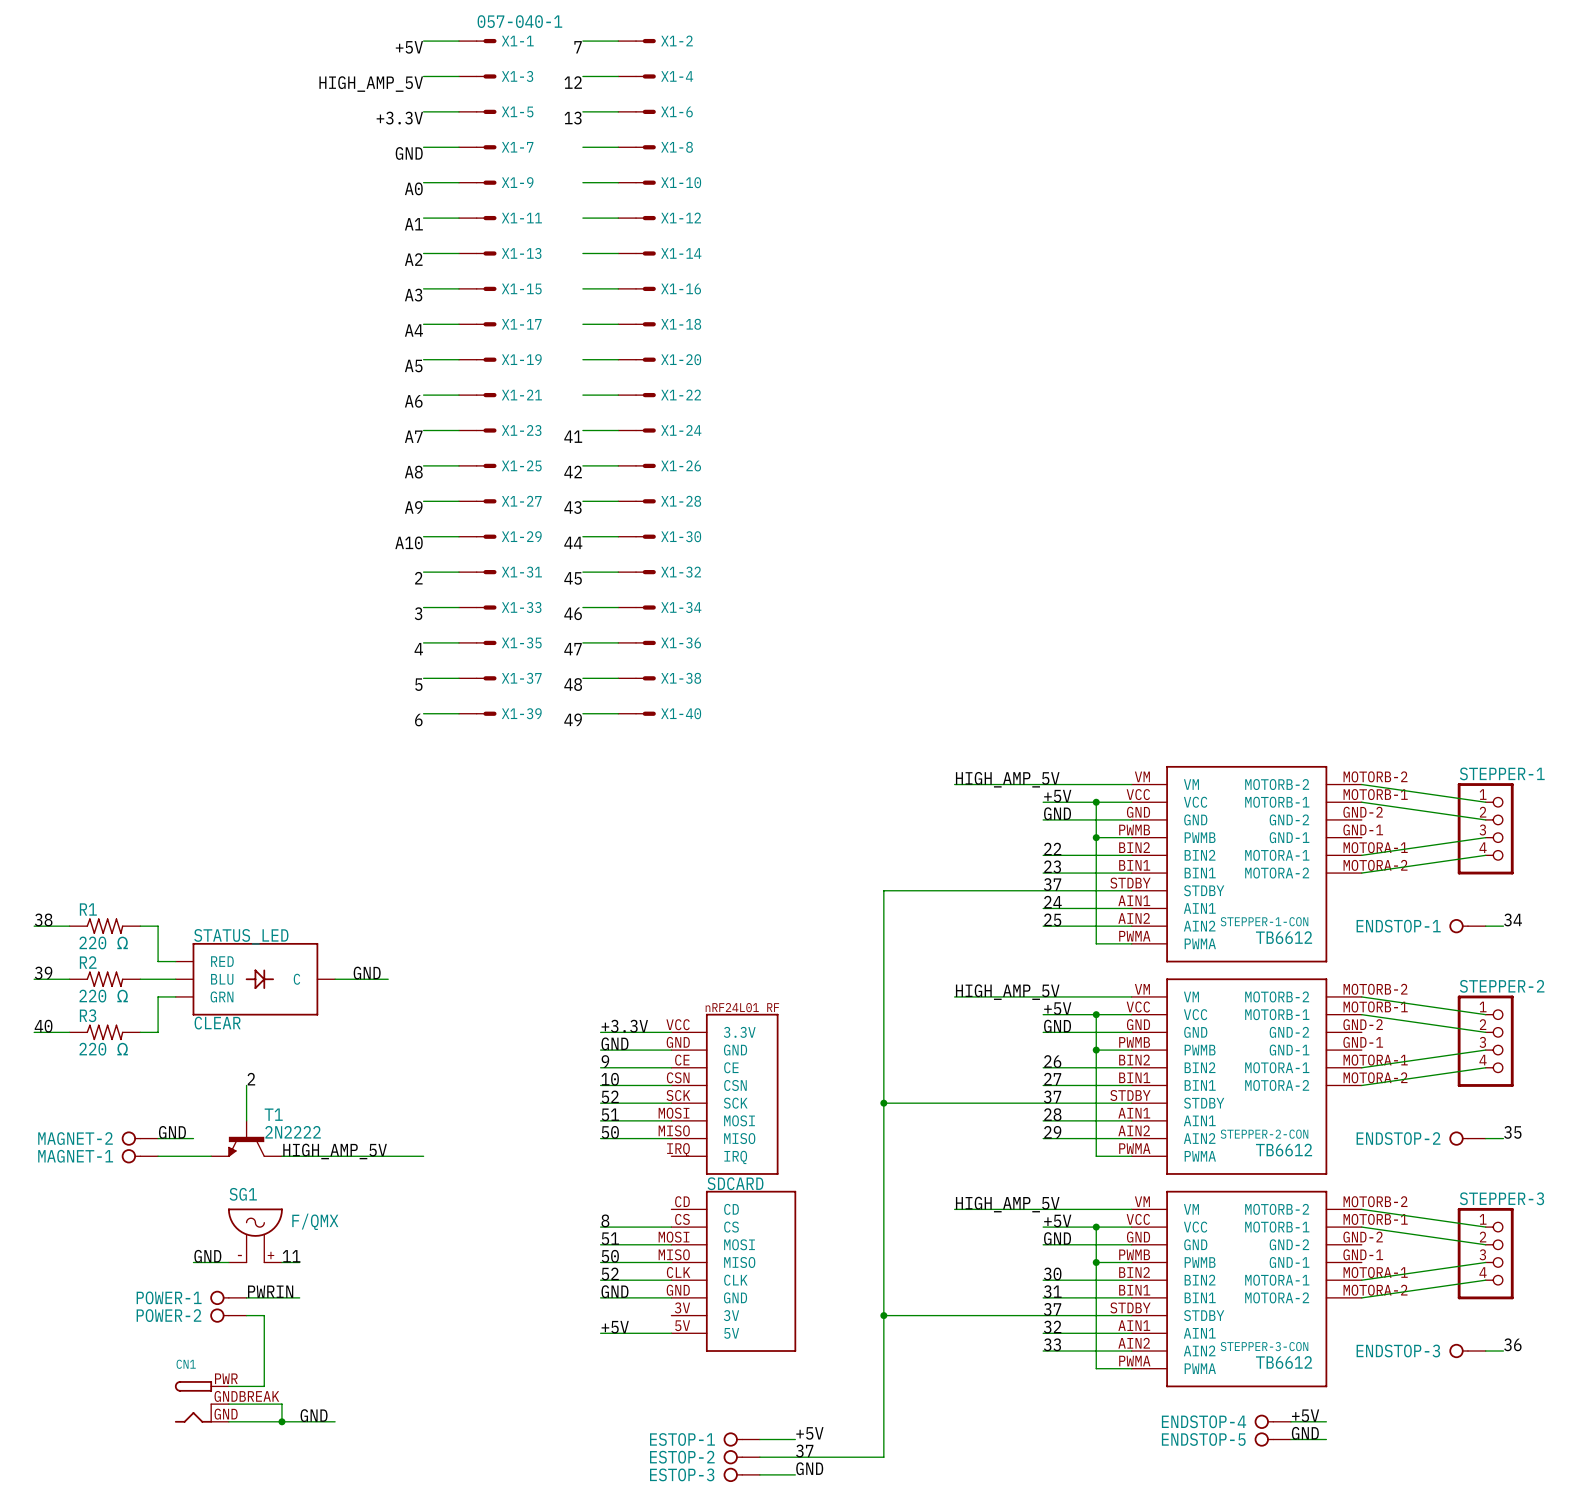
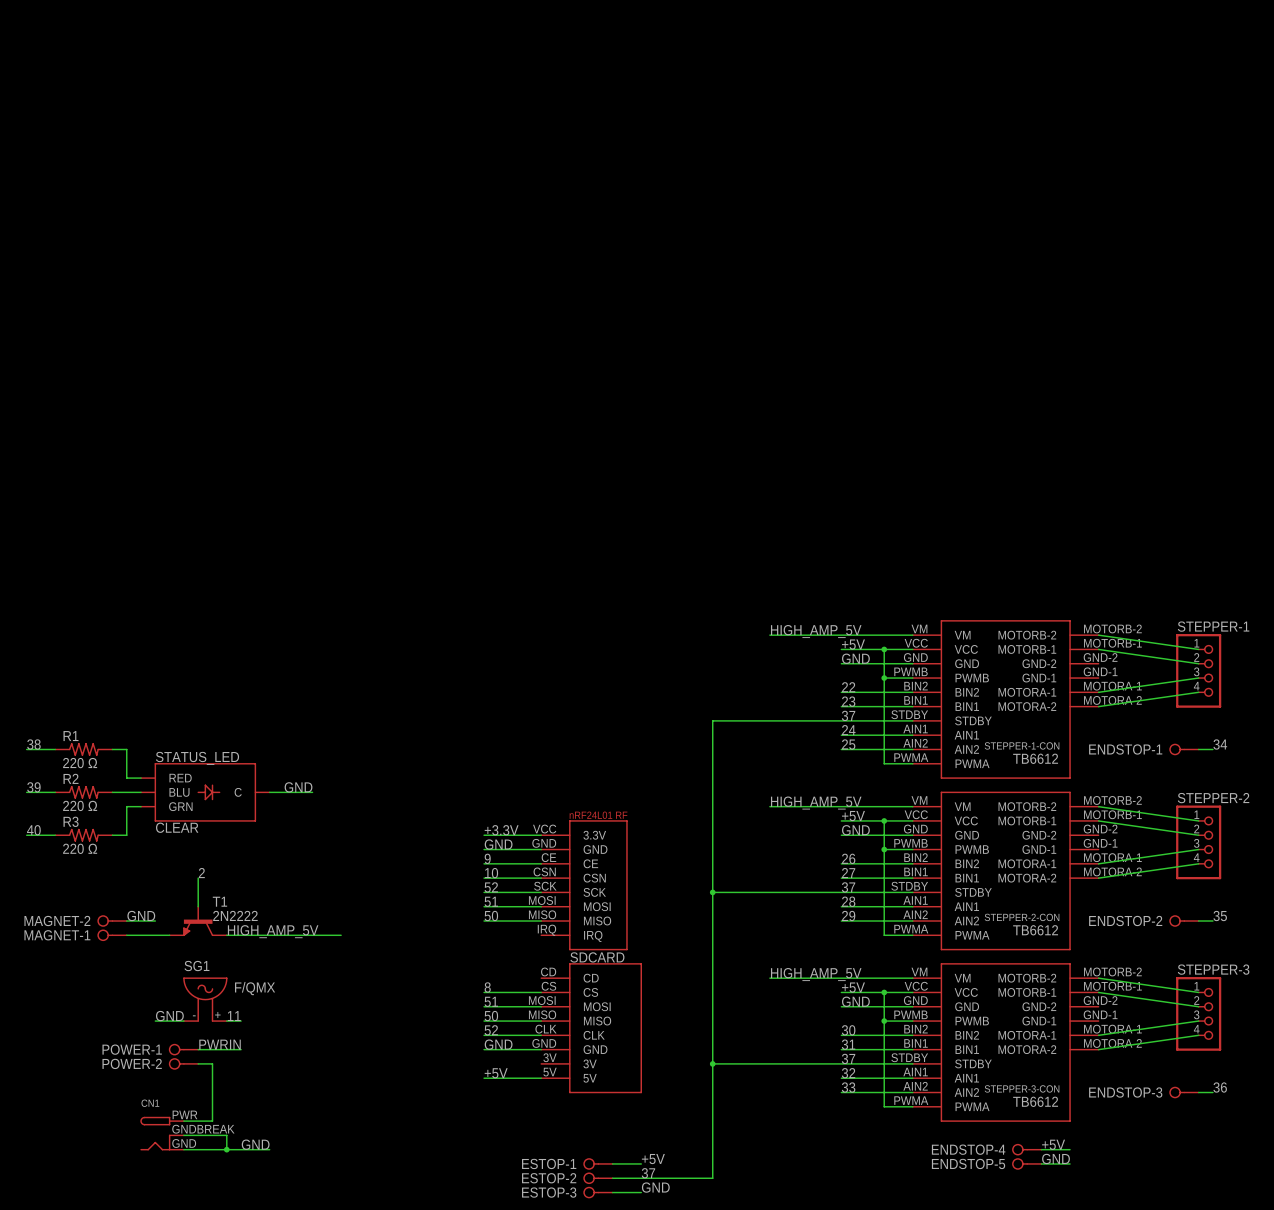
wire: (423, 41) (459, 41) -> none
X1-1: 057-040-1 (477, 41) -> none
wire: (582, 41) (618, 41) -> none
X1-2: (637, 41) -> none
label: +5V (409, 47) -> none
label: 7 (578, 47) -> none
wire: (423, 76) (459, 76) -> none
X1-3: (477, 76) -> none
wire: (582, 76) (618, 76) -> none
X1-4: (637, 76) -> none
label: 12 (573, 82) -> none
label: HIGH_AMP_5V (371, 84) -> none
wire: (423, 111) (459, 111) -> none
X1-5: (477, 111) -> none
wire: (582, 111) (618, 111) -> none
X1-6: (637, 111) -> none
label: +3.3V (399, 118) -> none
label: 13 (573, 118) -> none
wire: (423, 147) (459, 147) -> none
X1-7: (477, 147) -> none
wire: (582, 147) (618, 147) -> none
X1-8: (637, 147) -> none
label: GND (409, 153) -> none
wire: (423, 182) (459, 182) -> none
X1-9: (477, 182) -> none
wire: (582, 182) (618, 182) -> none
X1-10: (637, 182) -> none
label: A0 (413, 188) -> none
wire: (423, 218) (459, 218) -> none
X1-11: (477, 218) -> none
wire: (582, 218) (618, 218) -> none
X1-12: (637, 218) -> none
label: A1 (413, 224) -> none
wire: (423, 253) (459, 253) -> none
X1-13: (477, 253) -> none
wire: (582, 253) (618, 253) -> none
X1-14: (637, 253) -> none
label: A2 (413, 259) -> none
wire: (423, 288) (459, 288) -> none
X1-15: (477, 288) -> none
wire: (582, 288) (618, 288) -> none
X1-16: (637, 288) -> none
label: A3 (413, 295) -> none
wire: (423, 324) (459, 324) -> none
X1-17: (477, 324) -> none
wire: (582, 324) (618, 324) -> none
X1-18: (637, 324) -> none
label: A4 (413, 330) -> none
wire: (423, 359) (459, 359) -> none
X1-19: (477, 359) -> none
wire: (582, 359) (618, 359) -> none
X1-20: (637, 359) -> none
label: A5 (413, 366) -> none
wire: (423, 395) (459, 395) -> none
X1-21: (477, 395) -> none
wire: (582, 395) (618, 395) -> none
X1-22: (637, 395) -> none
label: A6 (413, 401) -> none
wire: (423, 430) (459, 430) -> none
X1-23: (477, 430) -> none
wire: (582, 430) (618, 430) -> none
X1-24: (637, 430) -> none
label: A7 (413, 436) -> none
label: 41 (573, 436) -> none
wire: (423, 465) (459, 465) -> none
X1-25: (477, 465) -> none
wire: (582, 465) (618, 465) -> none
X1-26: (637, 465) -> none
label: A8 (413, 472) -> none
label: 42 (573, 472) -> none
wire: (423, 501) (459, 501) -> none
X1-27: (477, 501) -> none
wire: (582, 501) (618, 501) -> none
X1-28: (637, 501) -> none
label: A9 (413, 507) -> none
label: 43 (572, 507) -> none
wire: (423, 536) (459, 536) -> none
X1-29: (477, 536) -> none
wire: (582, 536) (618, 536) -> none
X1-30: (637, 536) -> none
label: A10 (409, 542) -> none
label: 44 (573, 542) -> none
wire: (423, 572) (459, 572) -> none
X1-31: (477, 572) -> none
wire: (582, 572) (618, 572) -> none
X1-32: (637, 572) -> none
label: 2 (418, 578) -> none
label: 45 (573, 578) -> none
wire: (423, 607) (459, 607) -> none
X1-33: (477, 607) -> none
wire: (582, 607) (618, 607) -> none
X1-34: (637, 607) -> none
label: 3 (418, 613) -> none
label: 46 (573, 613) -> none
wire: (423, 642) (459, 642) -> none
X1-35: (477, 642) -> none
wire: (582, 642) (618, 642) -> none
X1-36: (637, 642) -> none
label: 4 (418, 649) -> none
label: 47 (573, 649) -> none
wire: (423, 678) (459, 678) -> none
X1-37: (477, 678) -> none
wire: (582, 678) (618, 678) -> none
X1-38: (637, 678) -> none
label: 5 (418, 684) -> none
label: 48 (573, 684) -> none
wire: (423, 713) (459, 713) -> none
X1-39: (477, 713) -> none
wire: (582, 713) (618, 713) -> none
X1-40: (637, 713) -> none
label: 49 (573, 719) -> none
label: 6 (418, 720) -> none

